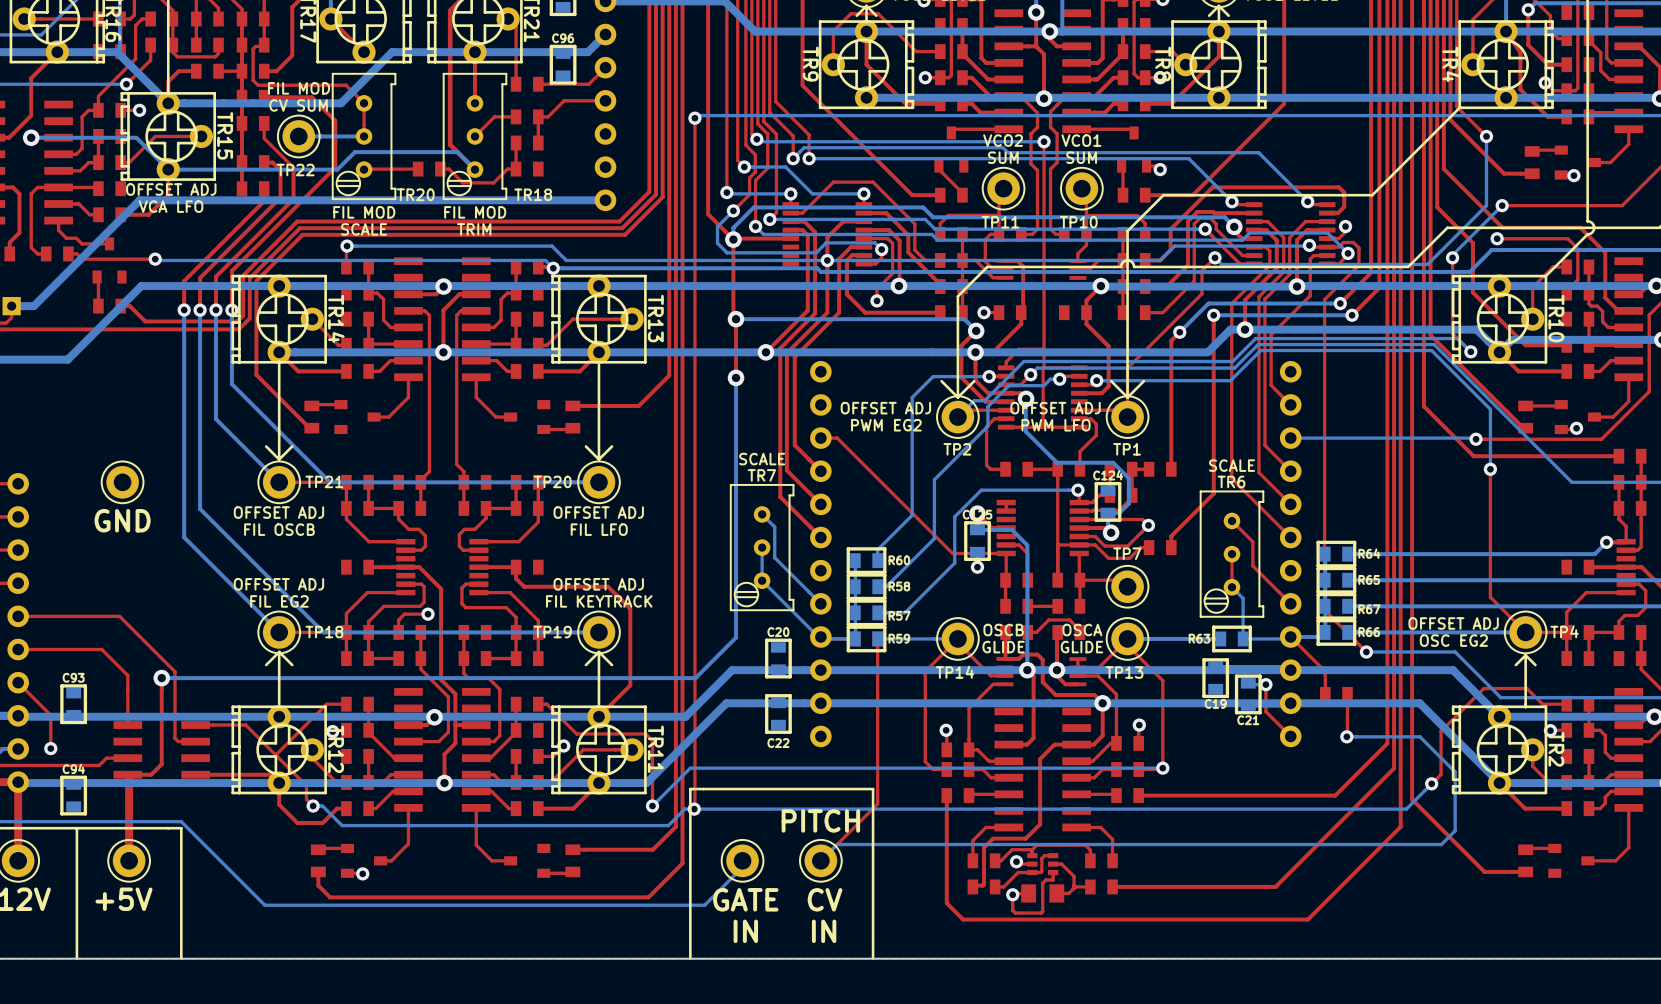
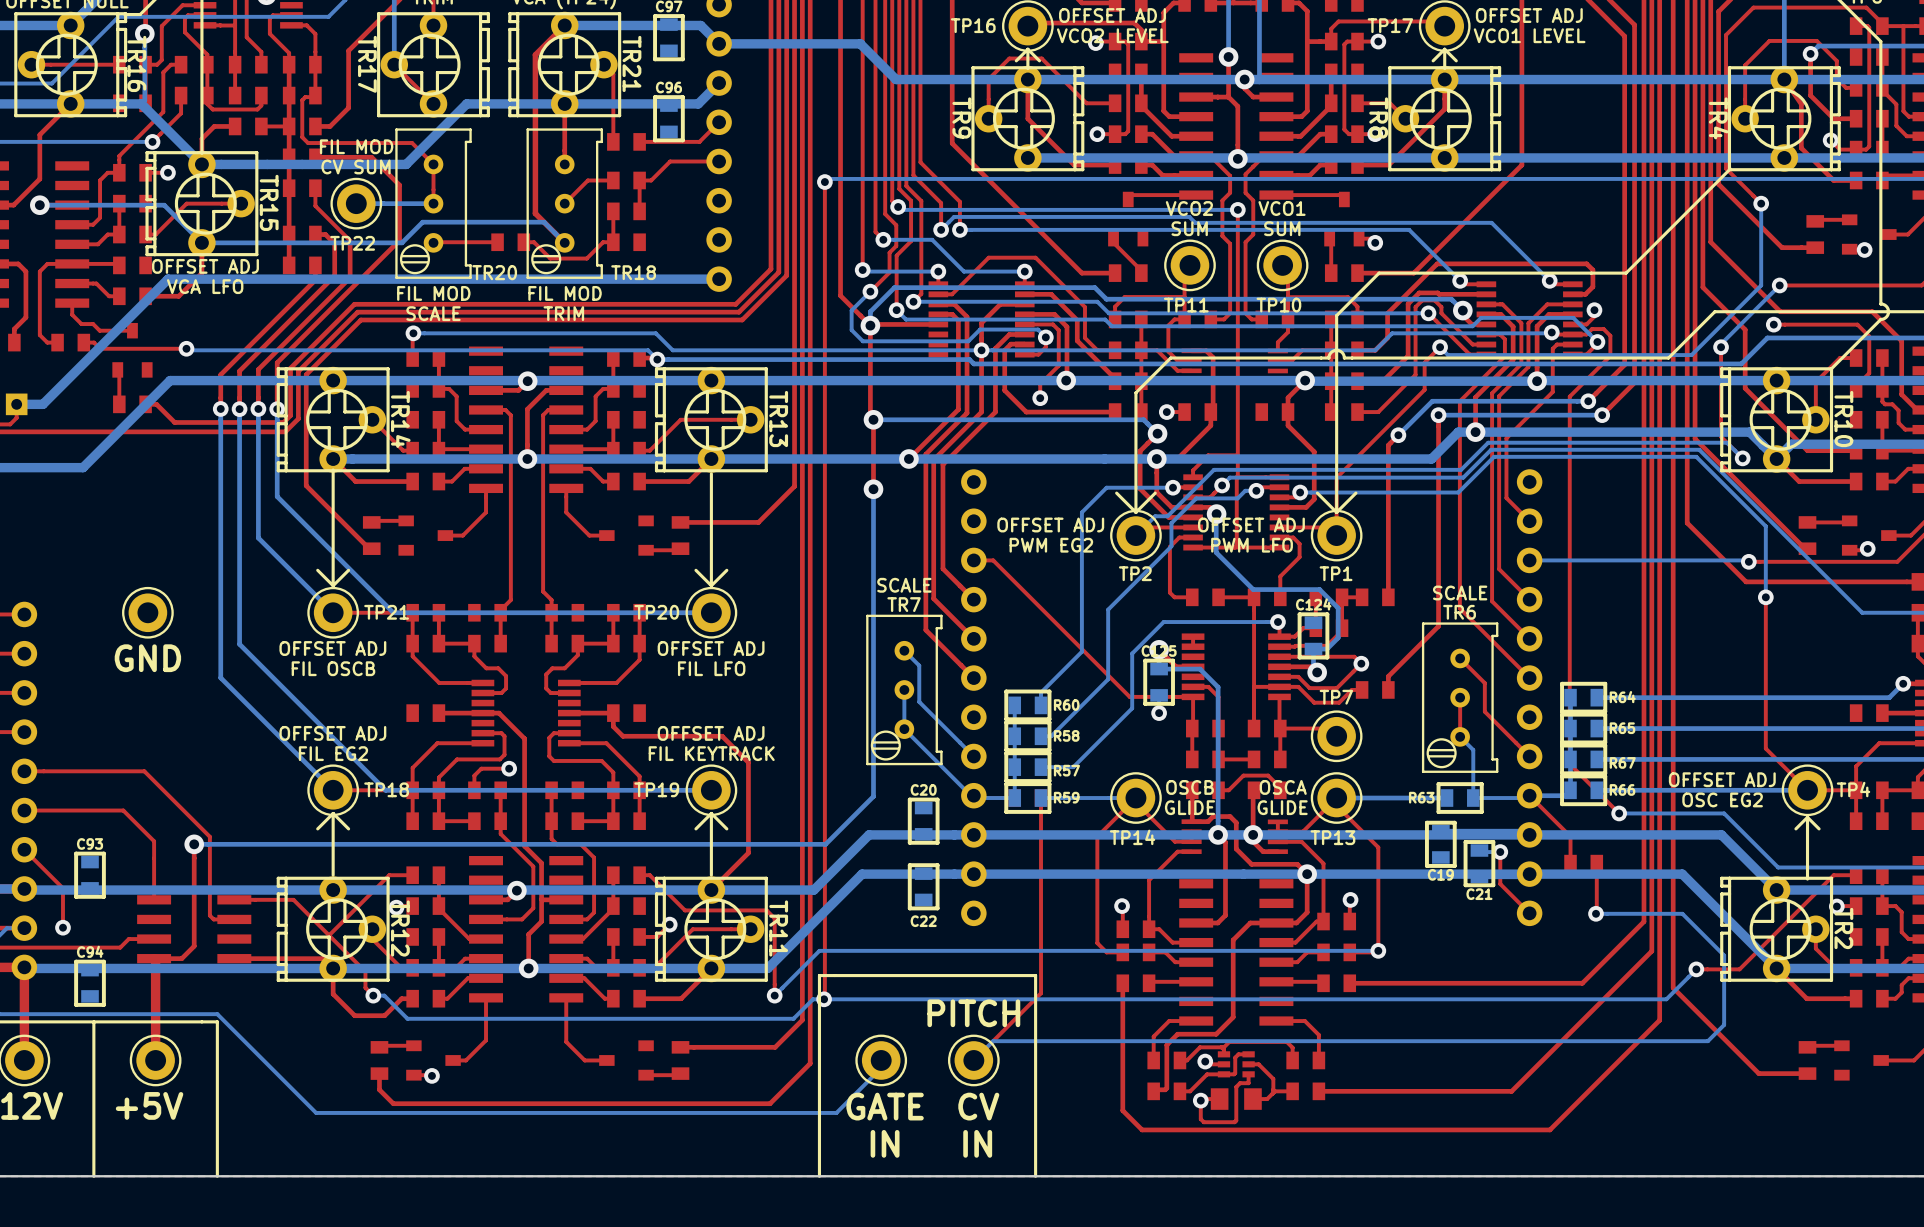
top track: (1547, 704) (1542, 704) (1526, 688) (1483, 688) (1441, 731) (1441, 774) (1431, 783) -> (1833, 875) (1739, 969) (1696, 969)

